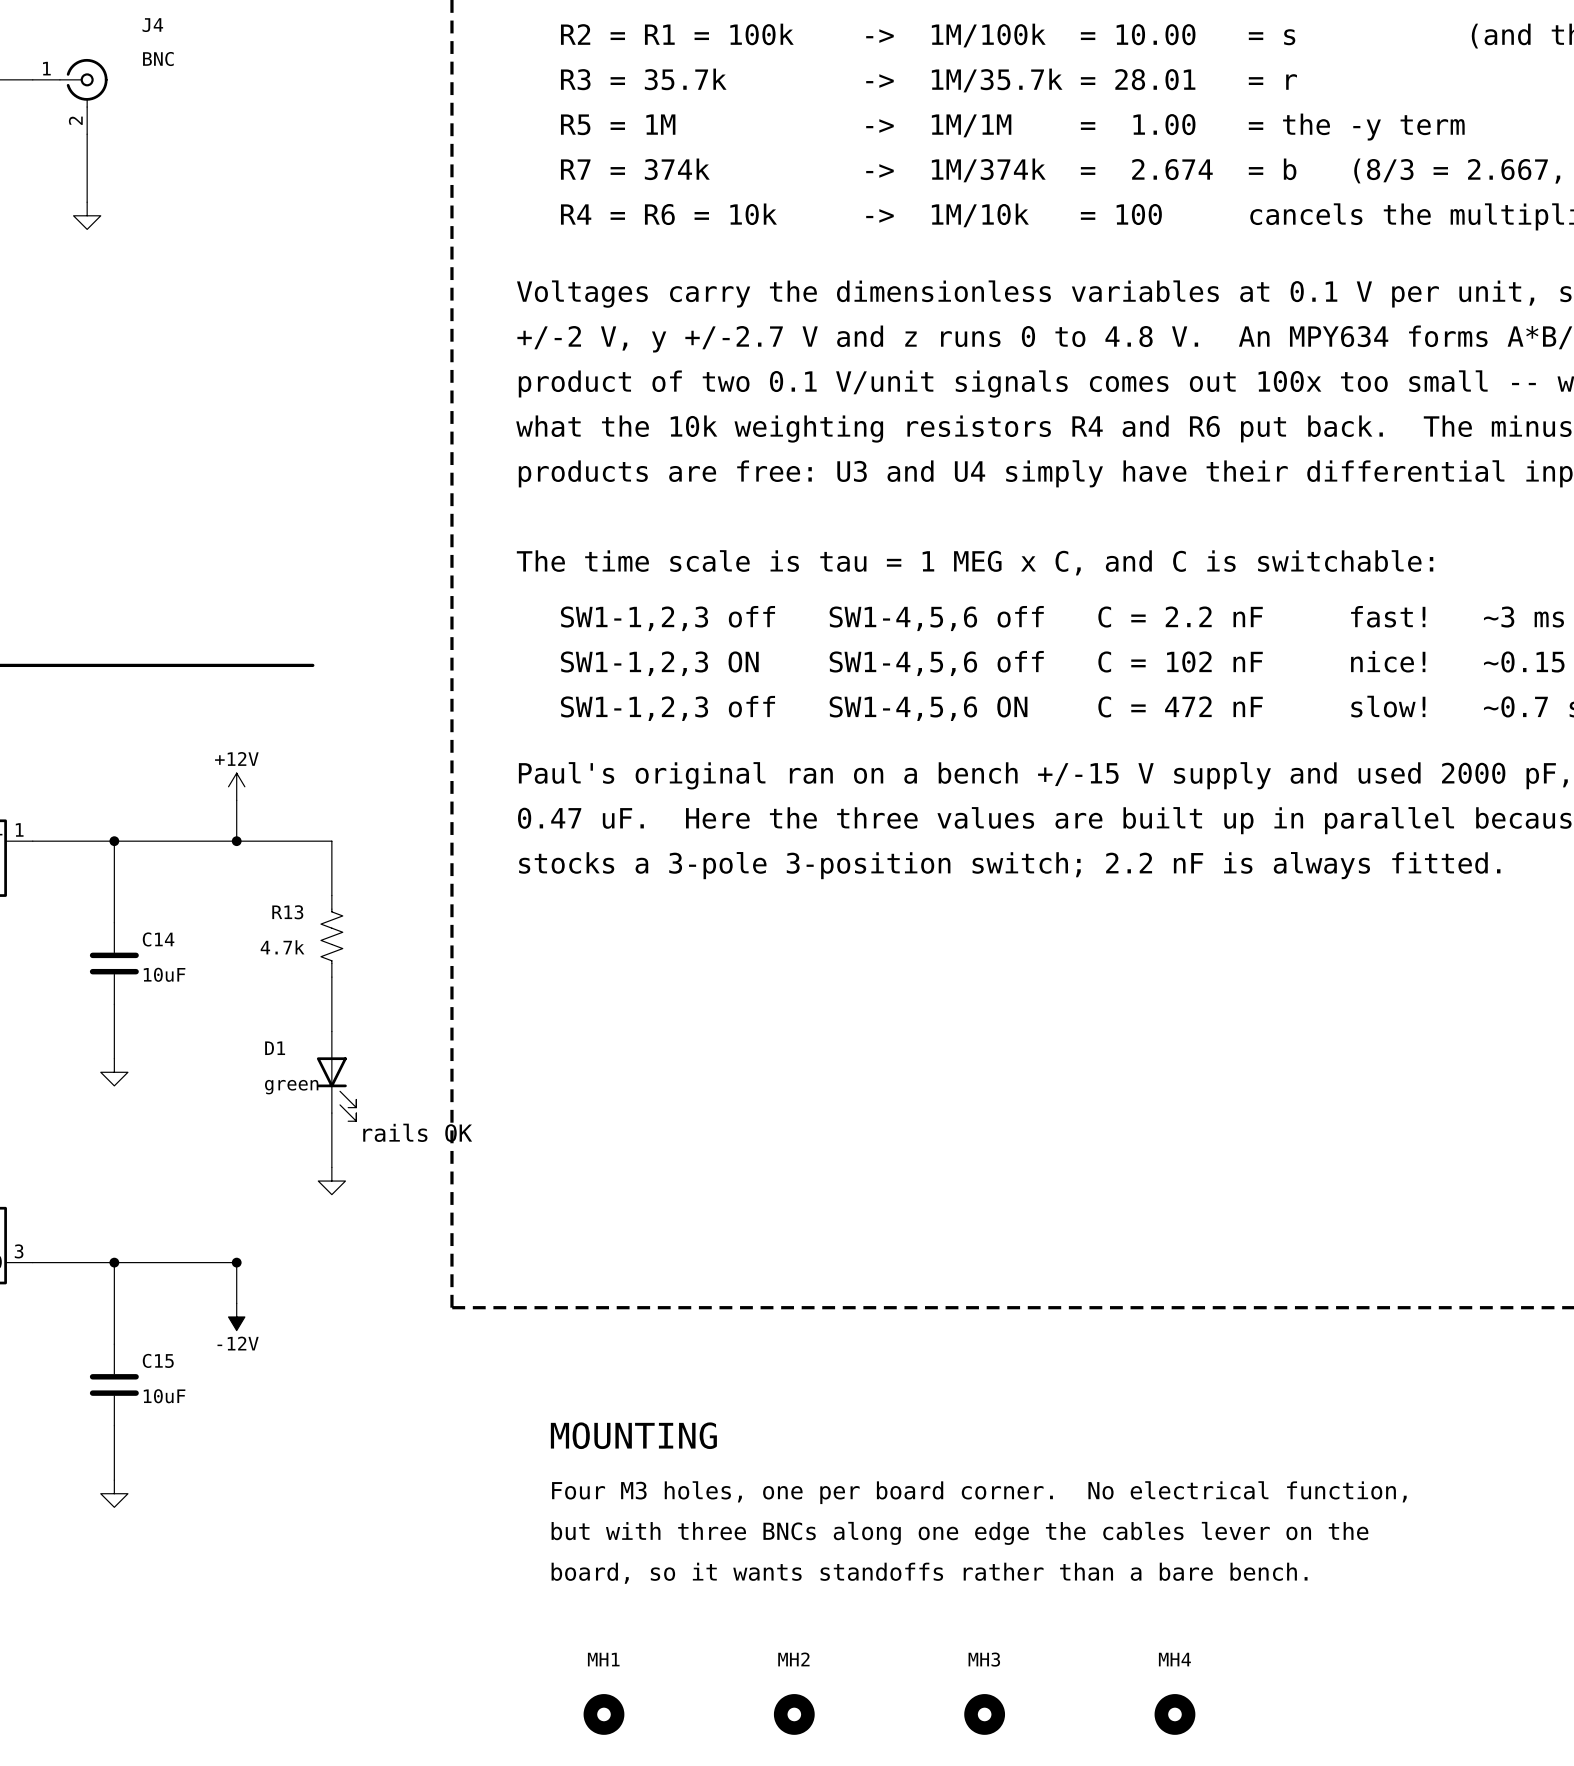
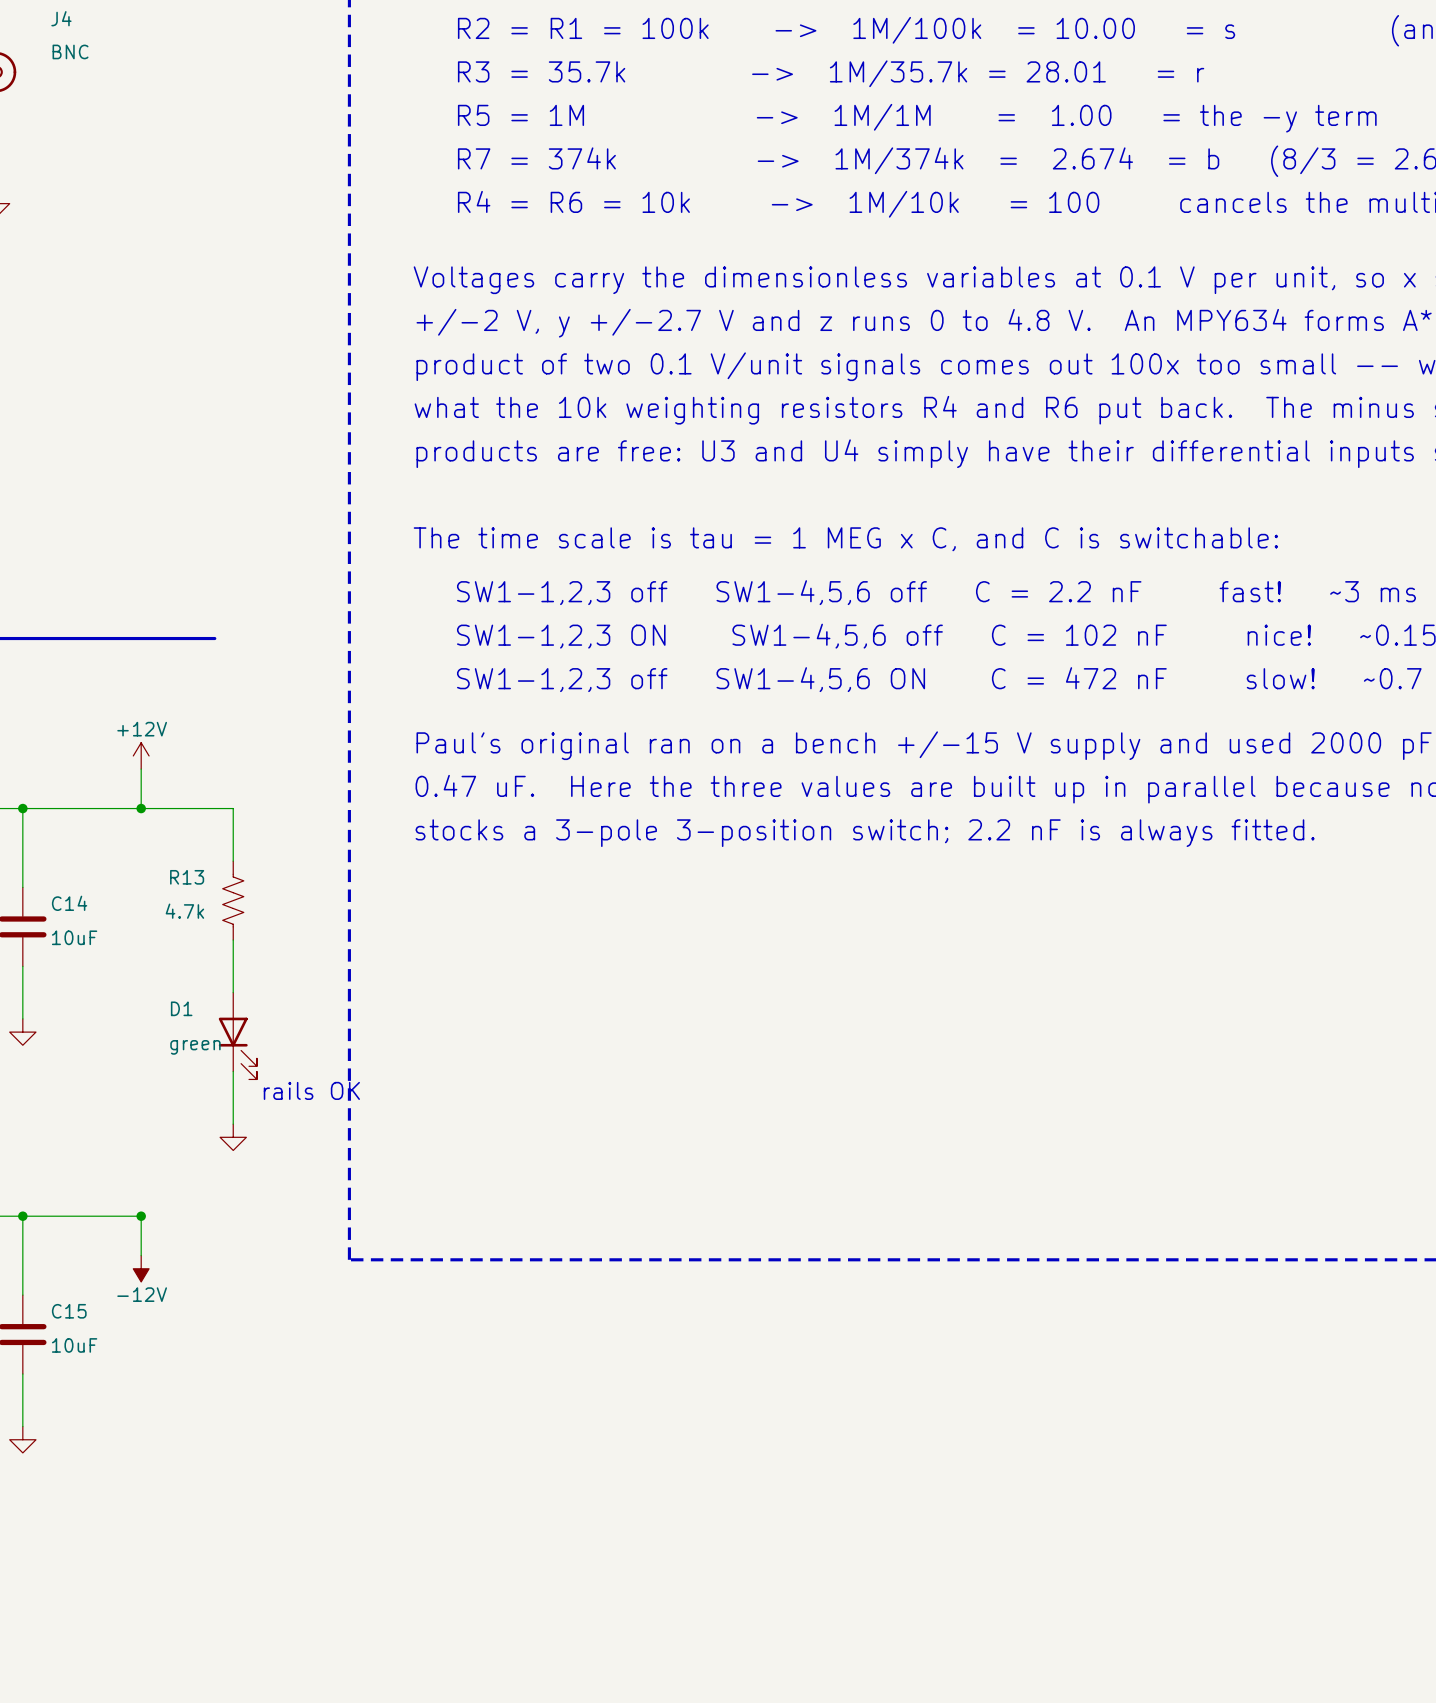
text: MOUNTING (633, 1435) -> none
text: Four M3 holes, one per board corner. No electrical function, (979, 1492) -> none
text: but with three BNCs along one edge the cables lever on the (959, 1533) -> none
text: board, so it wants standoffs rather than a bare bench. (929, 1573) -> none
MH1: (603, 1714) -> none
MH2: (794, 1714) -> none
MH3: (984, 1714) -> none
MH4: (1174, 1714) -> none

